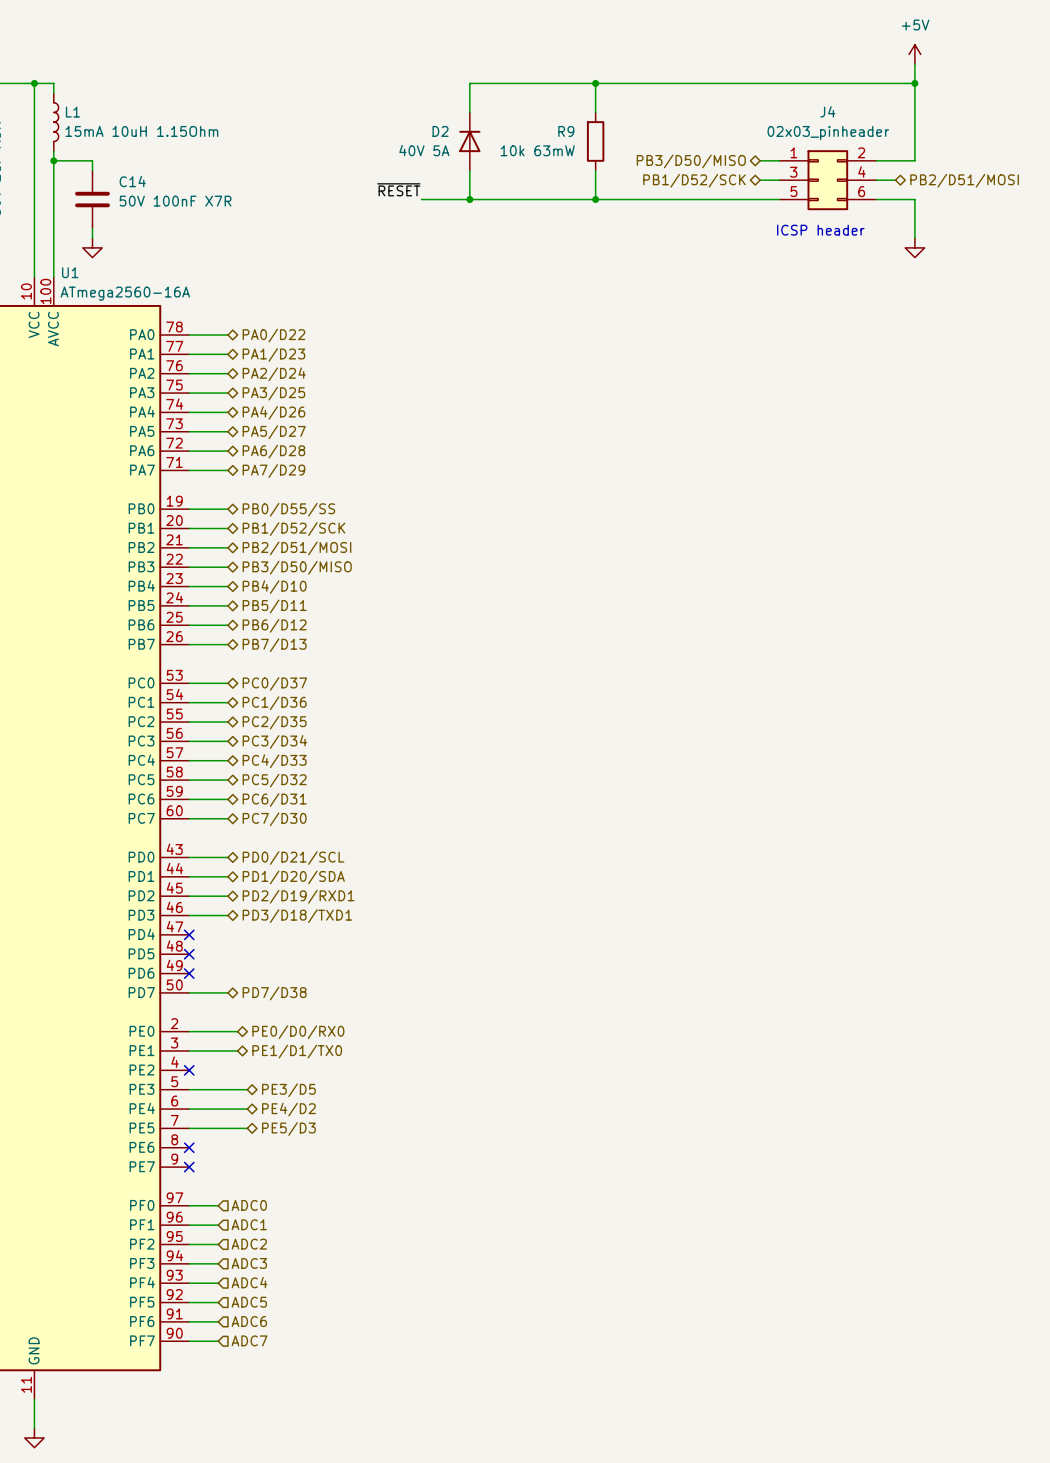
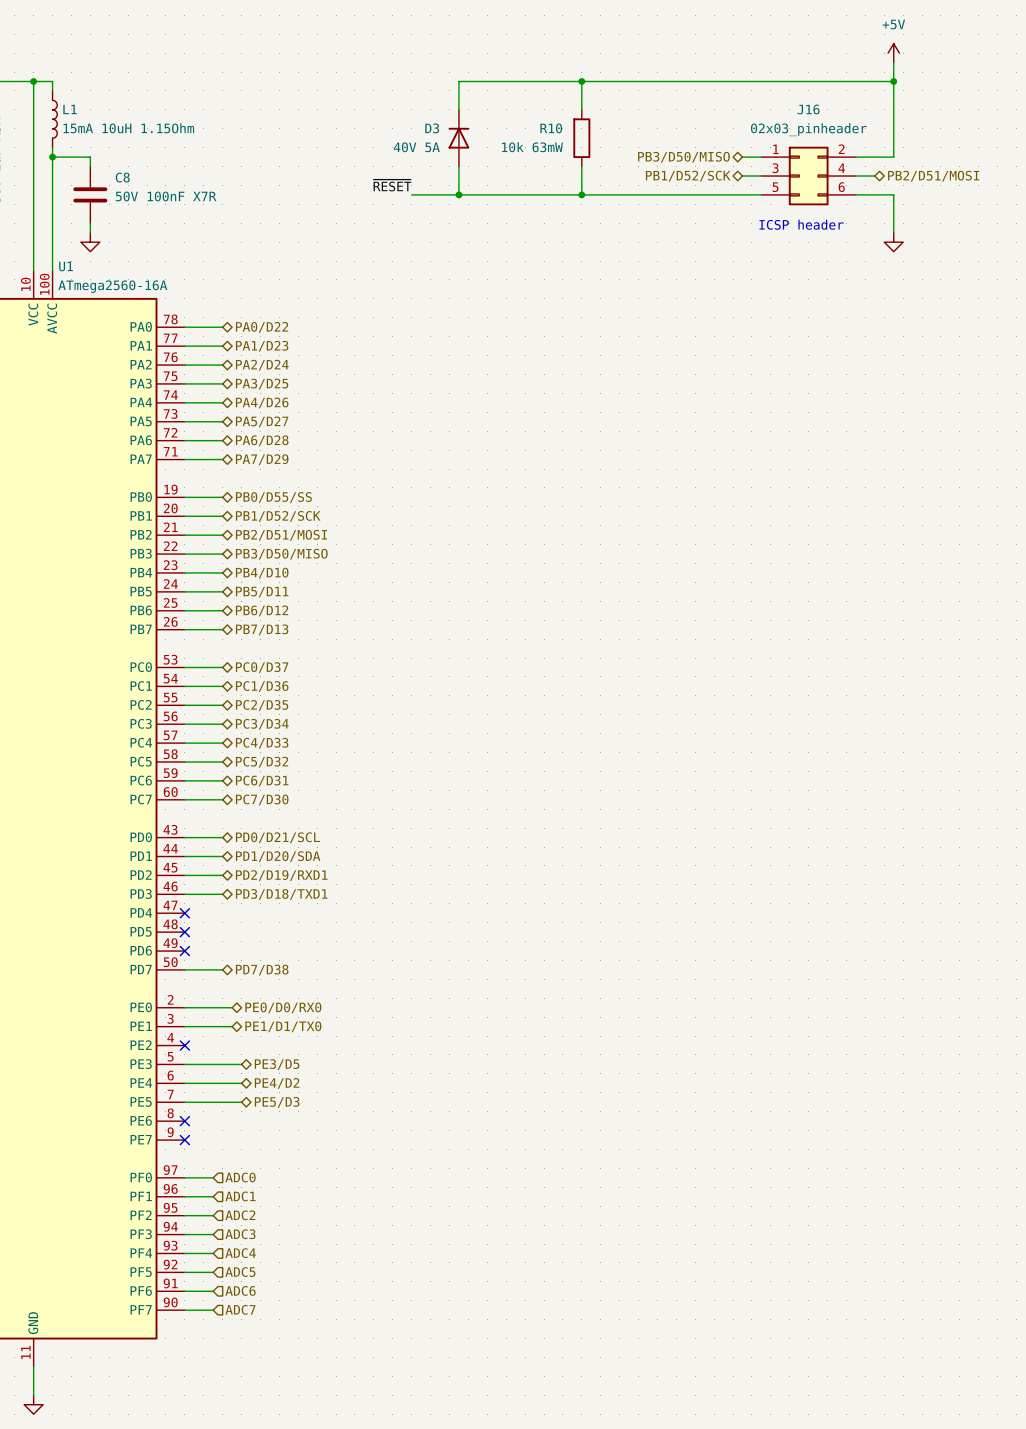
J4 name: J4 (827, 111) -> J16 (808, 109)
D2 name: D2 (440, 131) -> D3 (432, 128)
R9 name: R9 (566, 131) -> R10 (551, 128)
C14 name: C14 (132, 181) -> C8 (122, 177)

